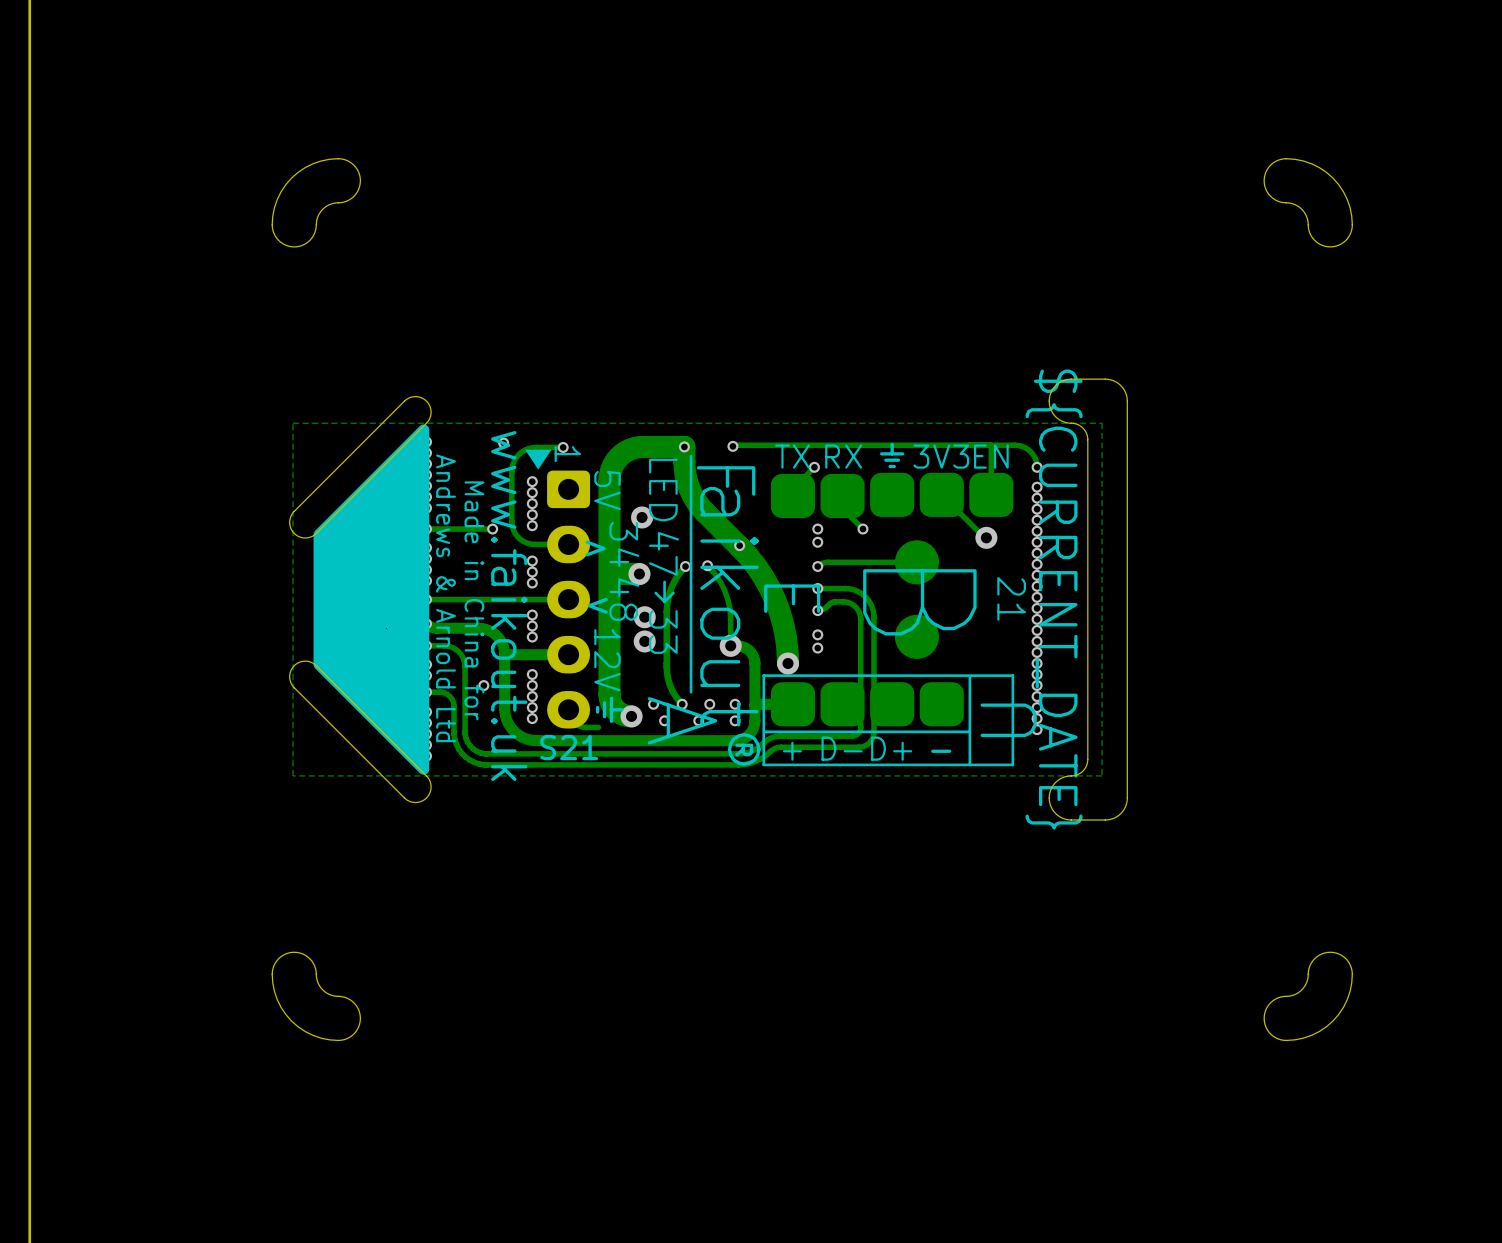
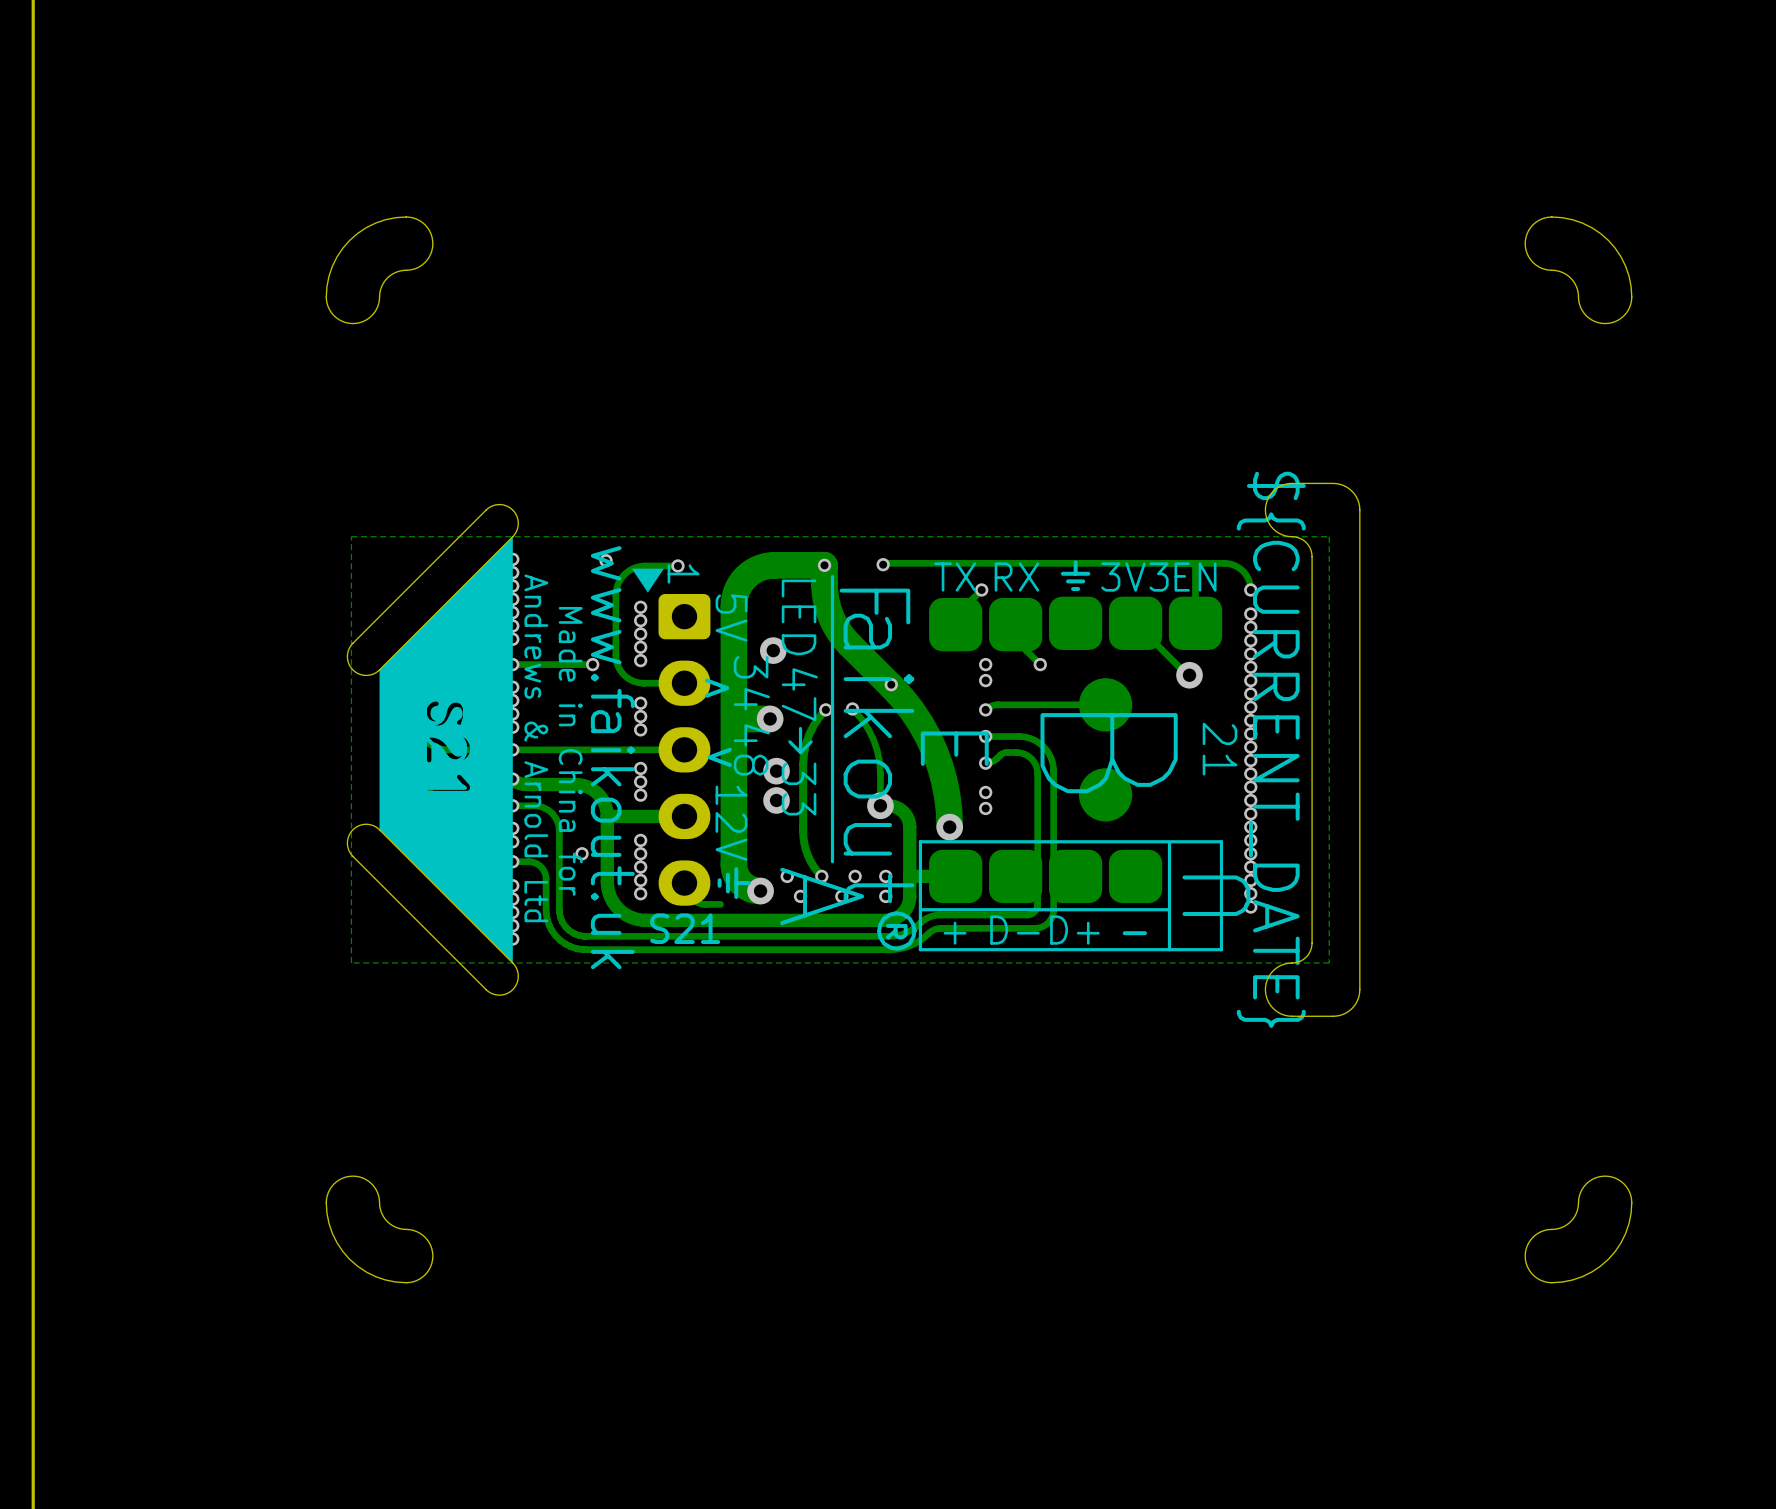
drawing shape: [313, 424, 430, 775] -> [379, 536, 513, 964]

